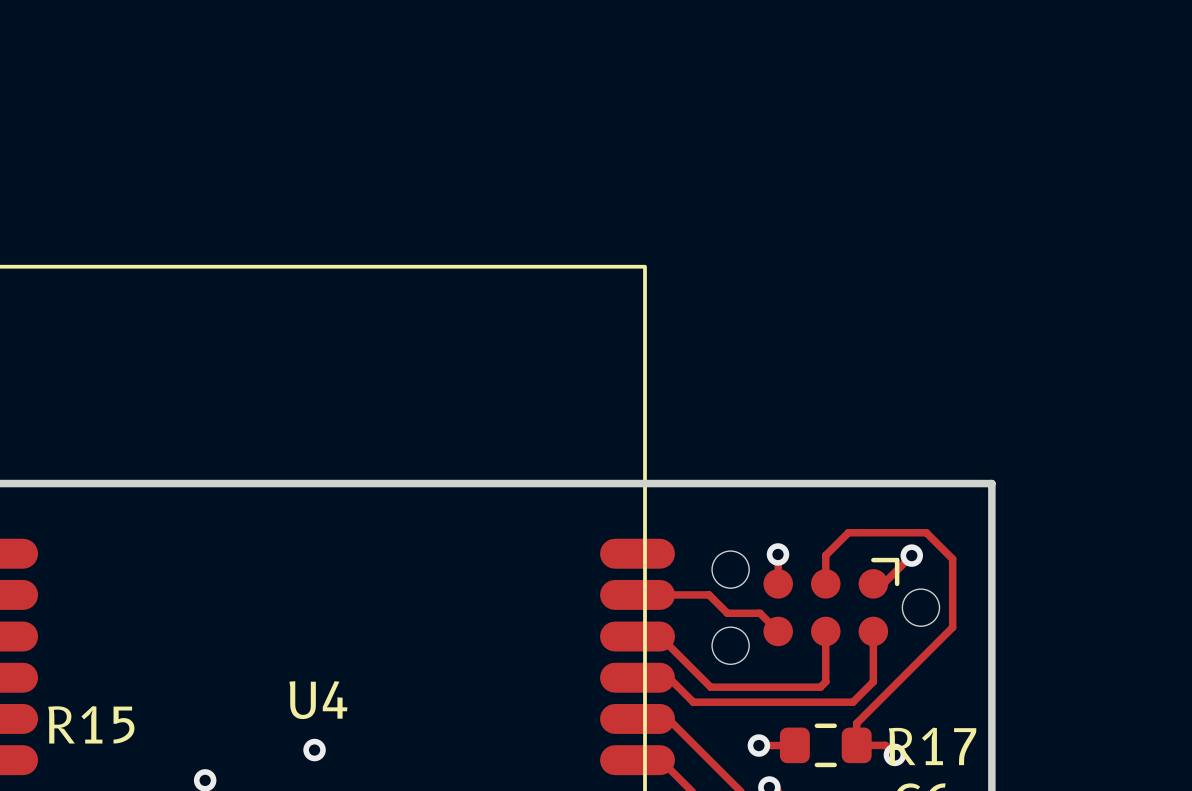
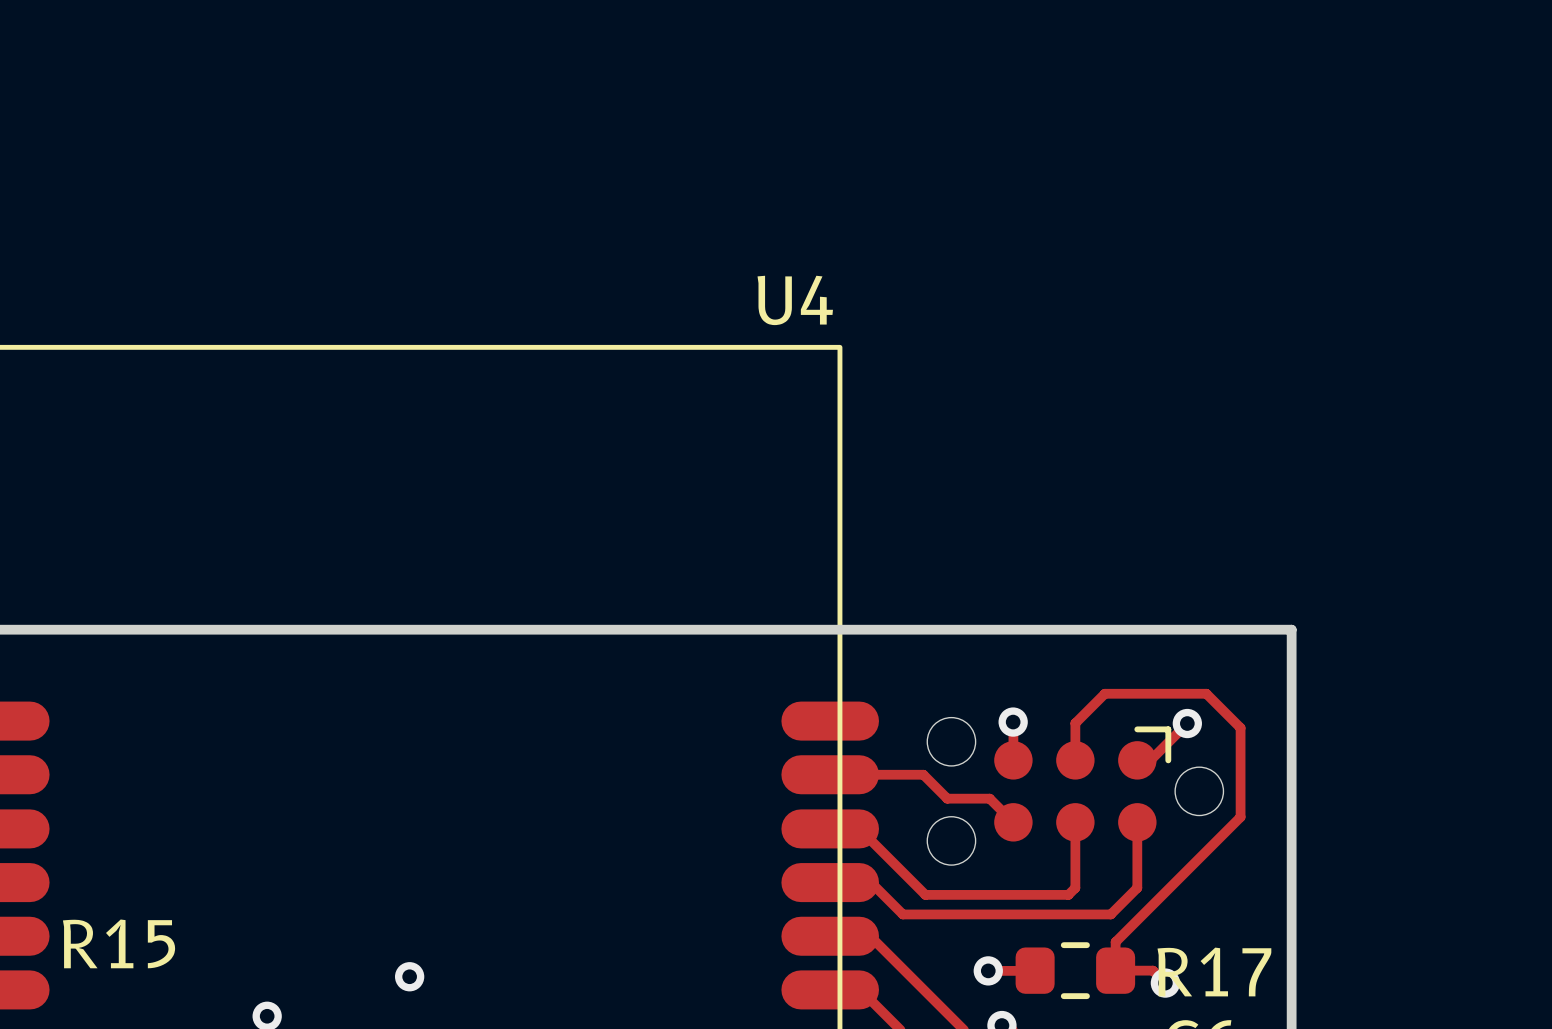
U4 name position: U4 (318, 700) -> U4 (795, 300)

